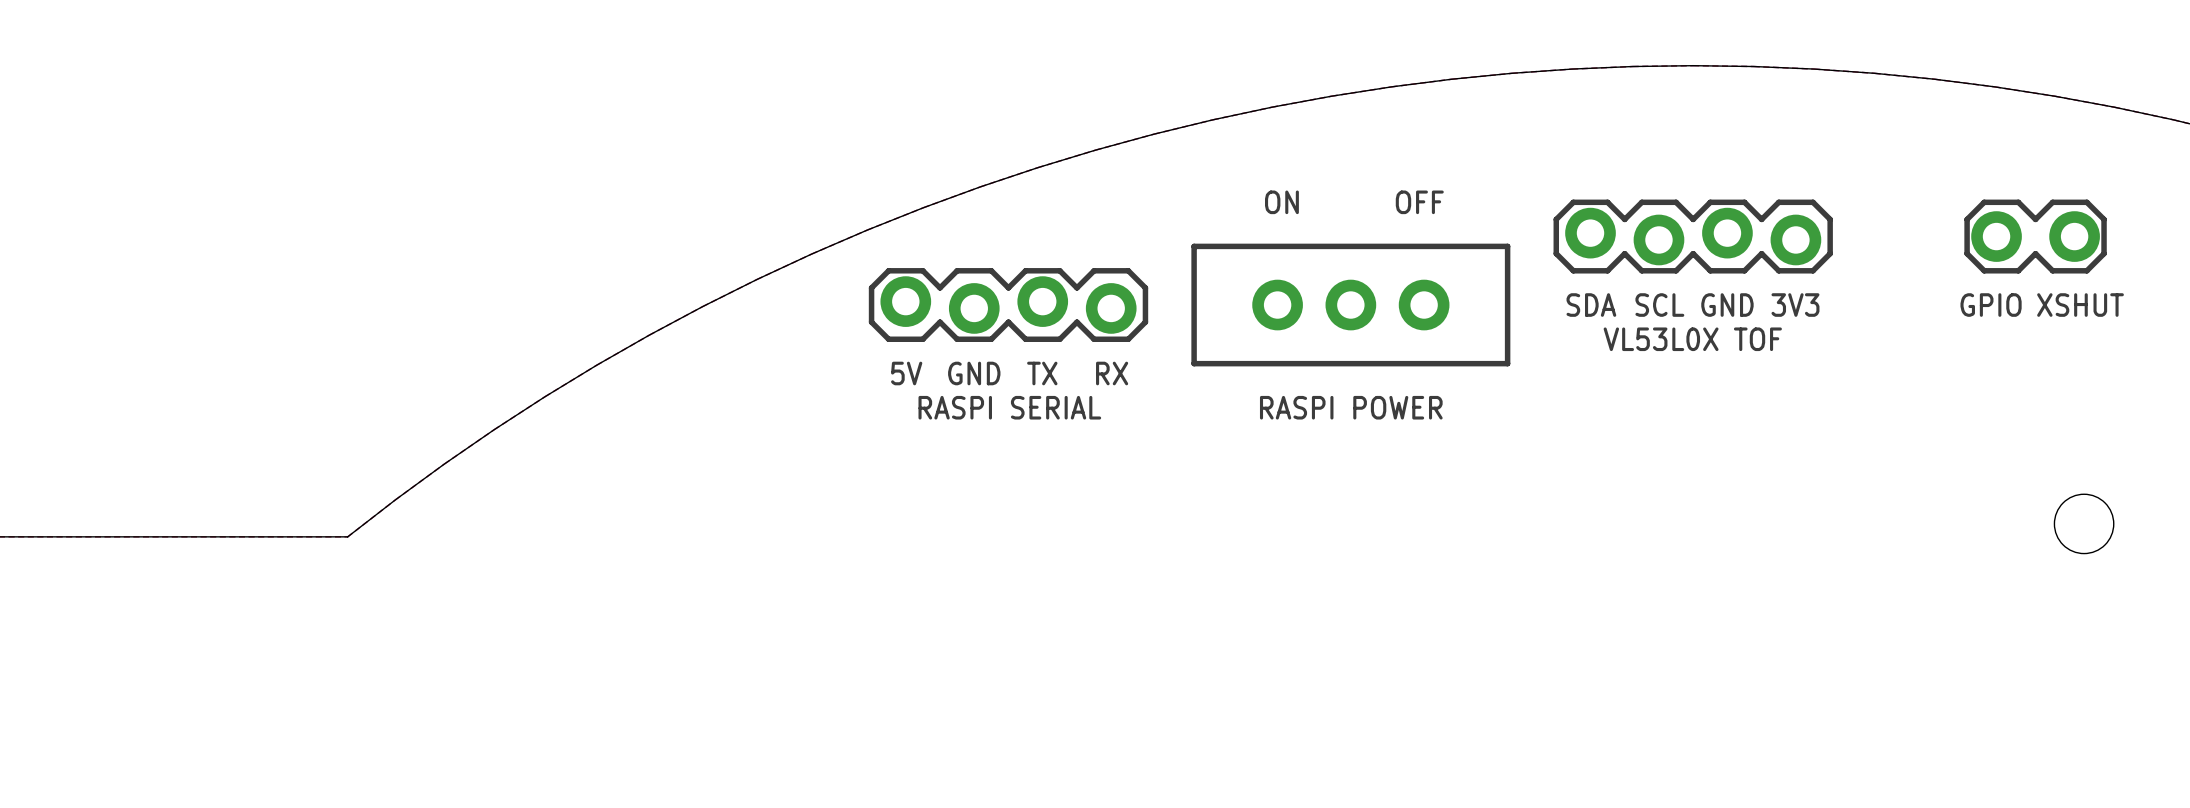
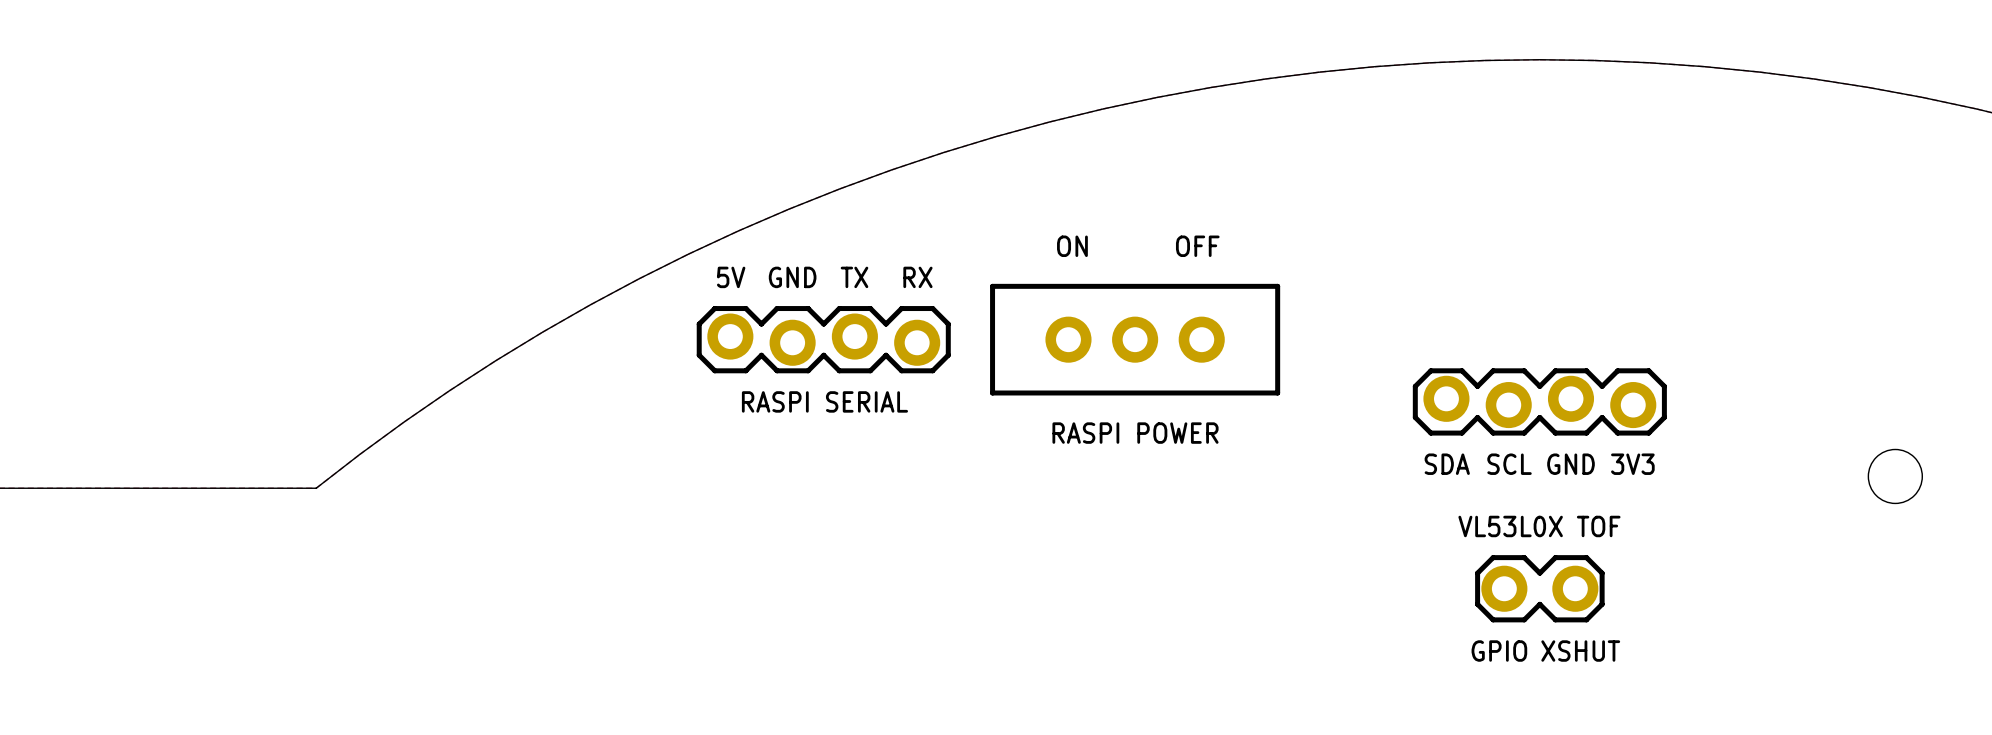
text position: ON (1281, 202) -> ON (1072, 246)
text position: OFF (1419, 202) -> OFF (1197, 246)
part position: (1693, 236) -> (1539, 401)
part position: (2035, 236) -> (1539, 588)
part position: (1008, 305) -> (823, 339)
part position: (1350, 305) -> (1135, 339)
text position: SDA (1591, 305) -> SDA (1447, 464)
text position: SCL (1659, 305) -> SCL (1509, 464)
text position: GND (1727, 305) -> GND (1570, 464)
text position: 3V3 (1795, 305) -> 3V3 (1632, 464)
text position: GPIO (1991, 305) -> GPIO (1499, 651)
text position: XSHUT (2080, 305) -> XSHUT (1580, 651)
text position: VL53L0X TOF (1692, 339) -> VL53L0X TOF (1539, 526)
text position: 5V (906, 373) -> 5V (731, 277)
text position: GND (974, 373) -> GND (792, 277)
text position: TX (1042, 373) -> TX (854, 277)
text position: RX (1112, 373) -> RX (917, 277)
text position: RASPI SERIAL (1009, 407) -> RASPI SERIAL (824, 401)
text position: RASPI POWER (1351, 407) -> RASPI POWER (1135, 433)

